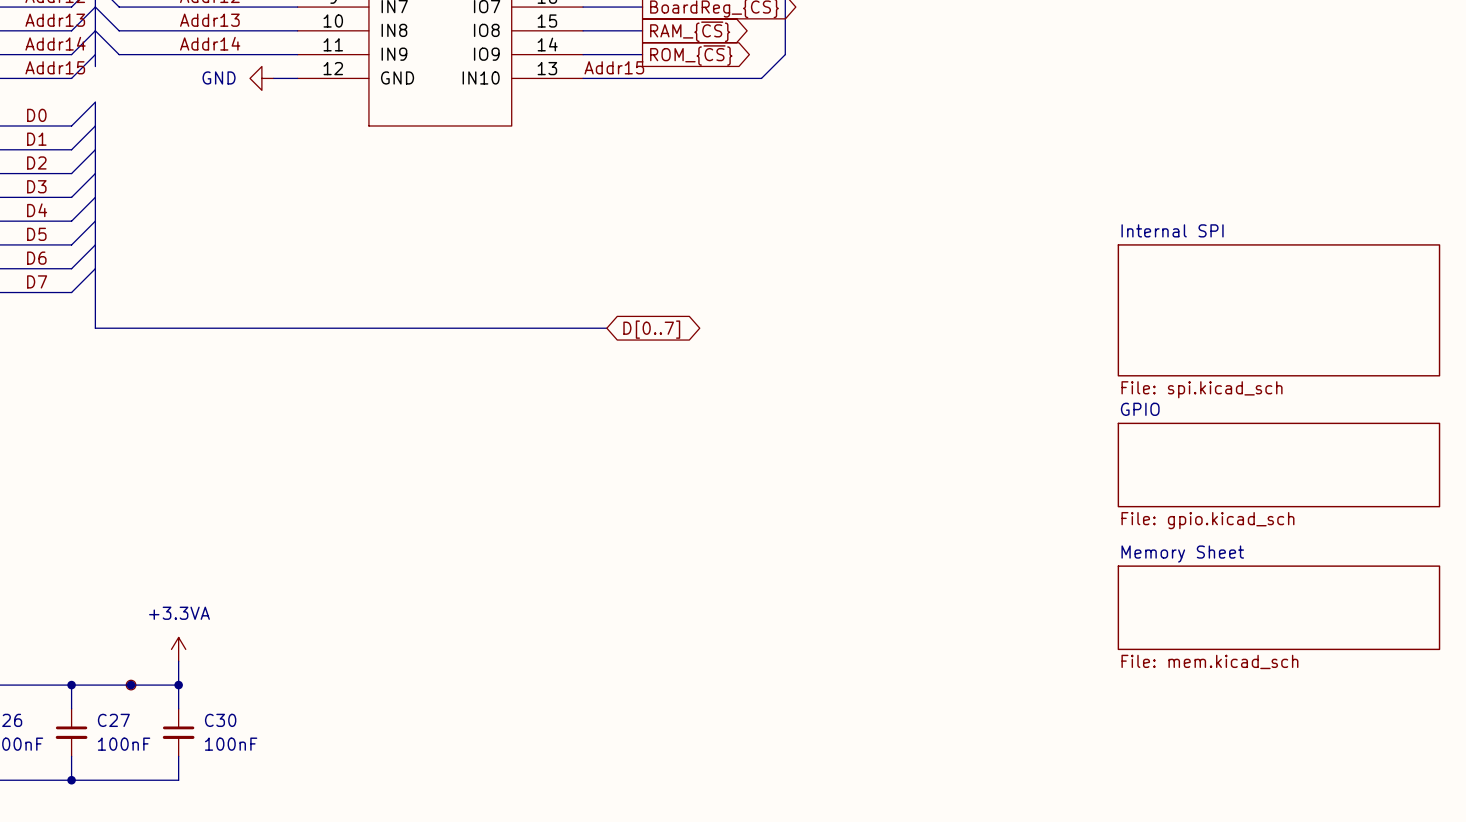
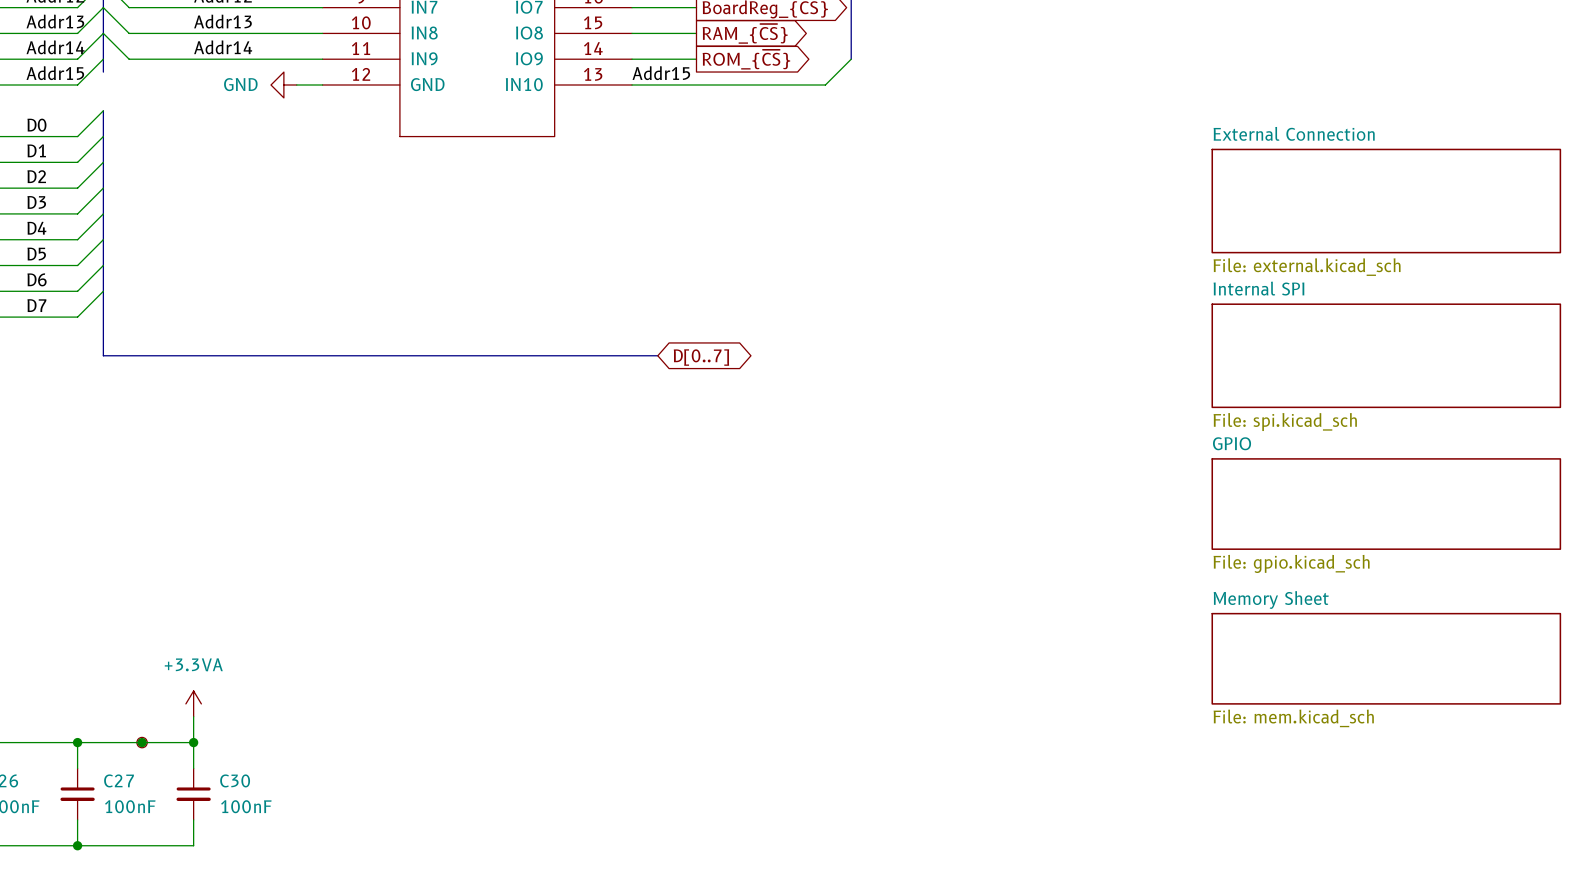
sheet External Connection: none -> File: external.kicad_sch (1386, 201)
sheet Internal SPI: File: spi.kicad_sch (1278, 310) -> none
sheet Internal SPI: none -> File: spi.kicad_sch (1386, 355)

